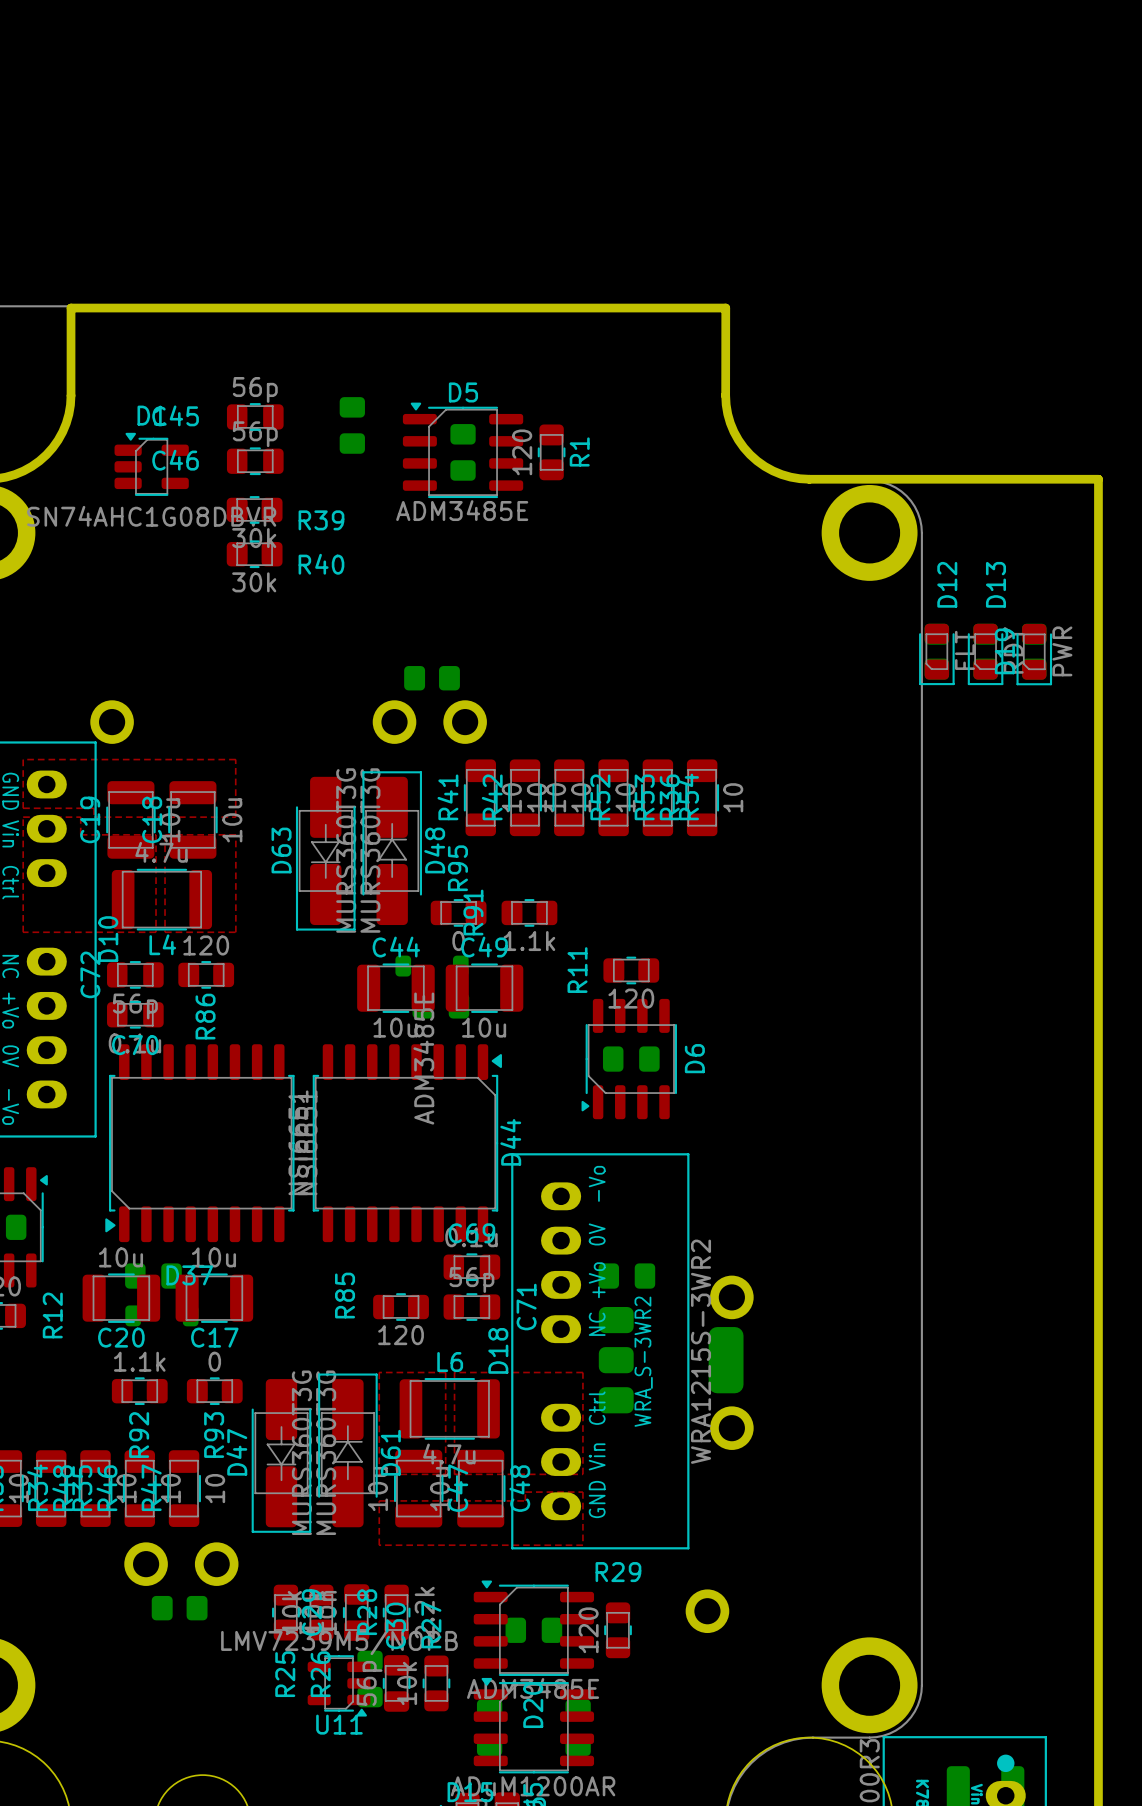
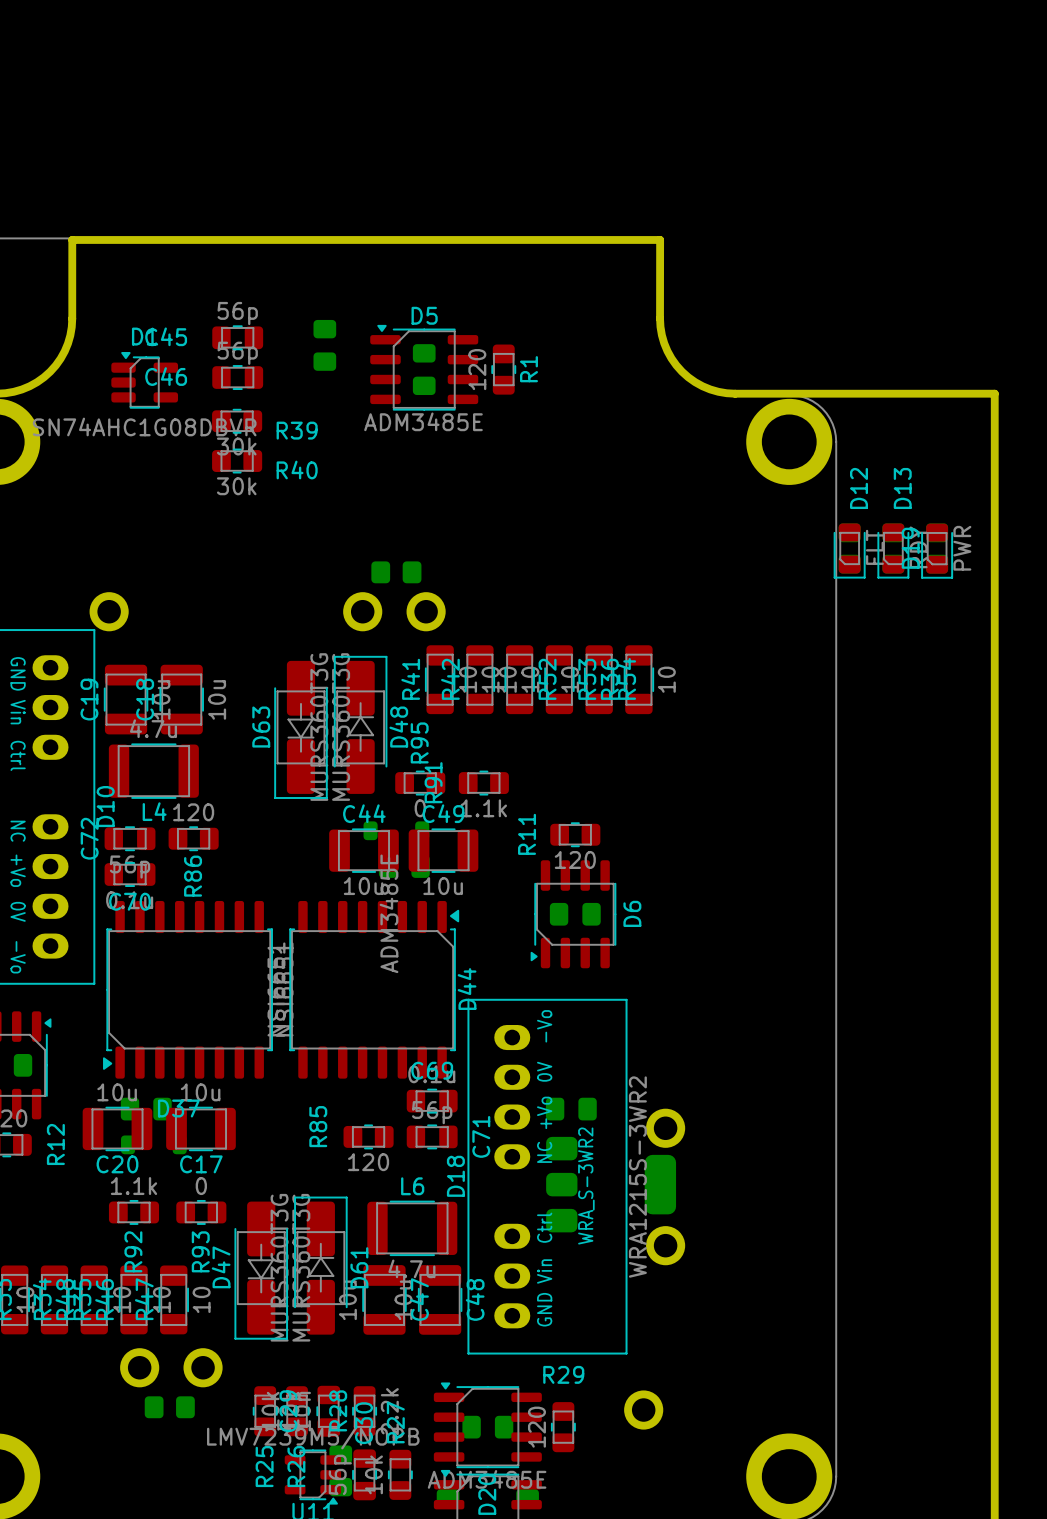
top zone outline: (23, 759) (235, 759) (235, 817) (94, 817) (94, 808) (23, 808) (23, 759) -> none
top zone outline: (23, 817) (80, 817) (80, 834) (156, 834) (156, 932) (23, 932) (23, 817) -> none
top zone outline: (165, 834) (165, 932) (235, 932) (235, 834) (165, 834) -> none
top zone outline: (379, 1372) (445, 1372) (445, 1474) (379, 1474) (379, 1372) -> none
top zone outline: (454, 1372) (454, 1474) (582, 1474) (582, 1372) (454, 1372) -> none
top zone outline: (525, 1492) (525, 1500) (379, 1500) (379, 1545) (582, 1545) (582, 1492) (525, 1492) -> none

